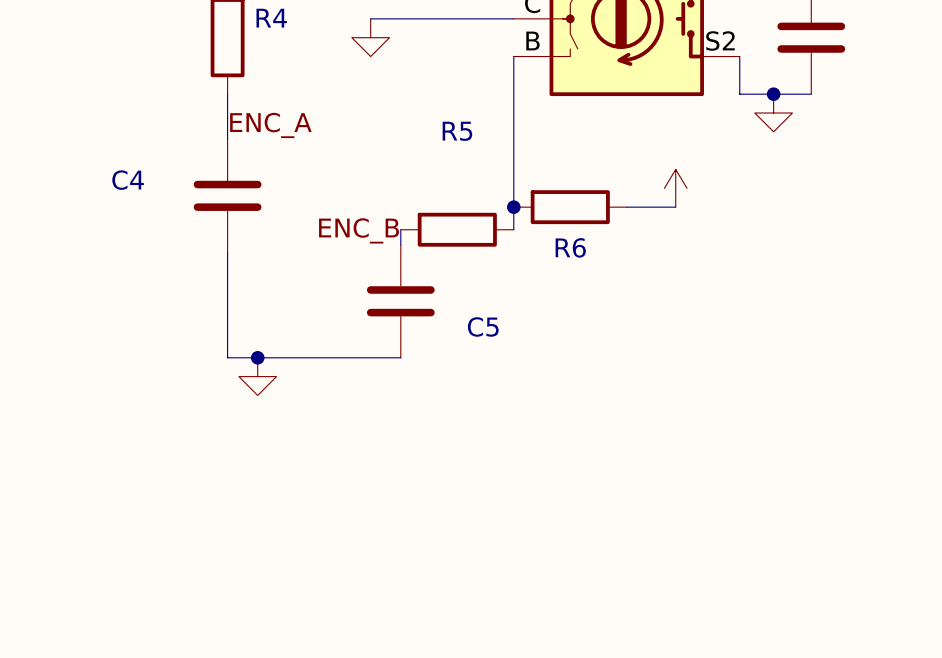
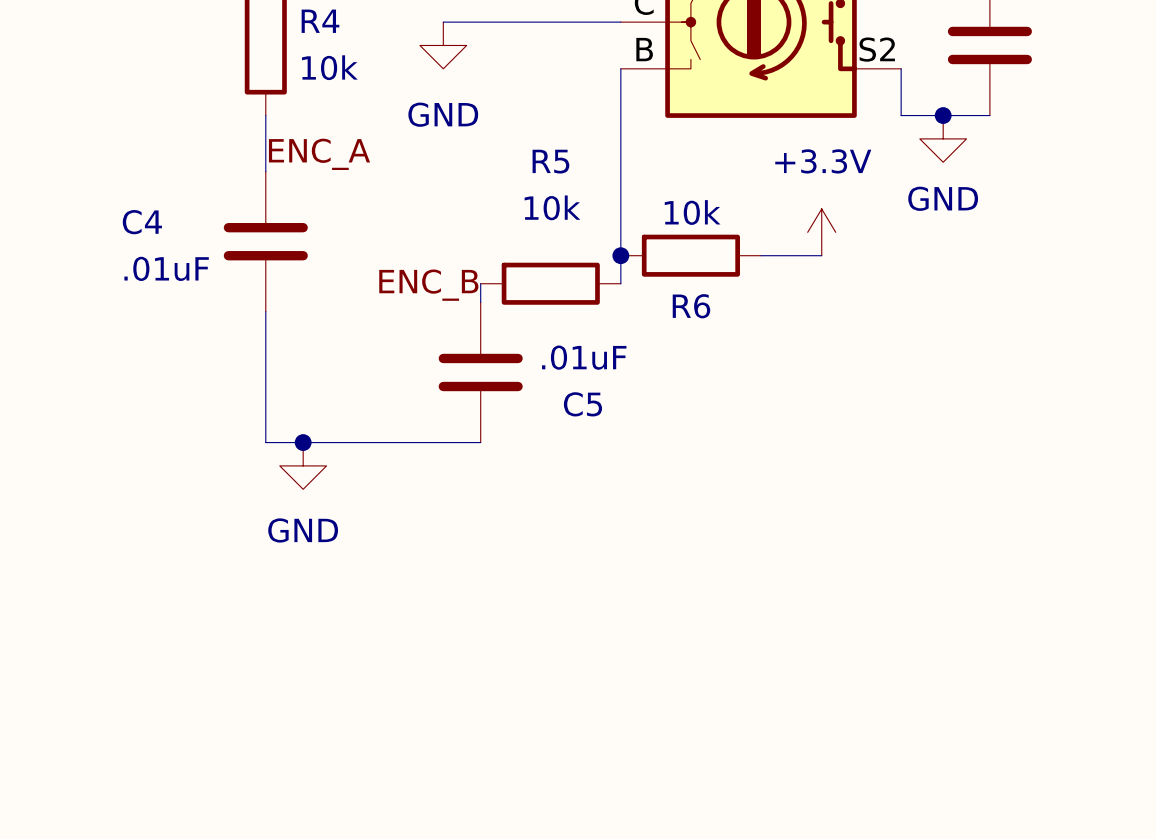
R4 value: none -> 10k (329, 67)
power symbol text: none -> GND (443, 114)
power symbol text: none -> +3.3V (823, 161)
power symbol text: none -> GND (943, 198)
R5 value: none -> 10k (552, 207)
R6 value: none -> 10k (692, 212)
C4 value: none -> .01uF (166, 268)
C5 value: none -> .01uF (584, 357)
power symbol text: none -> GND (303, 530)

